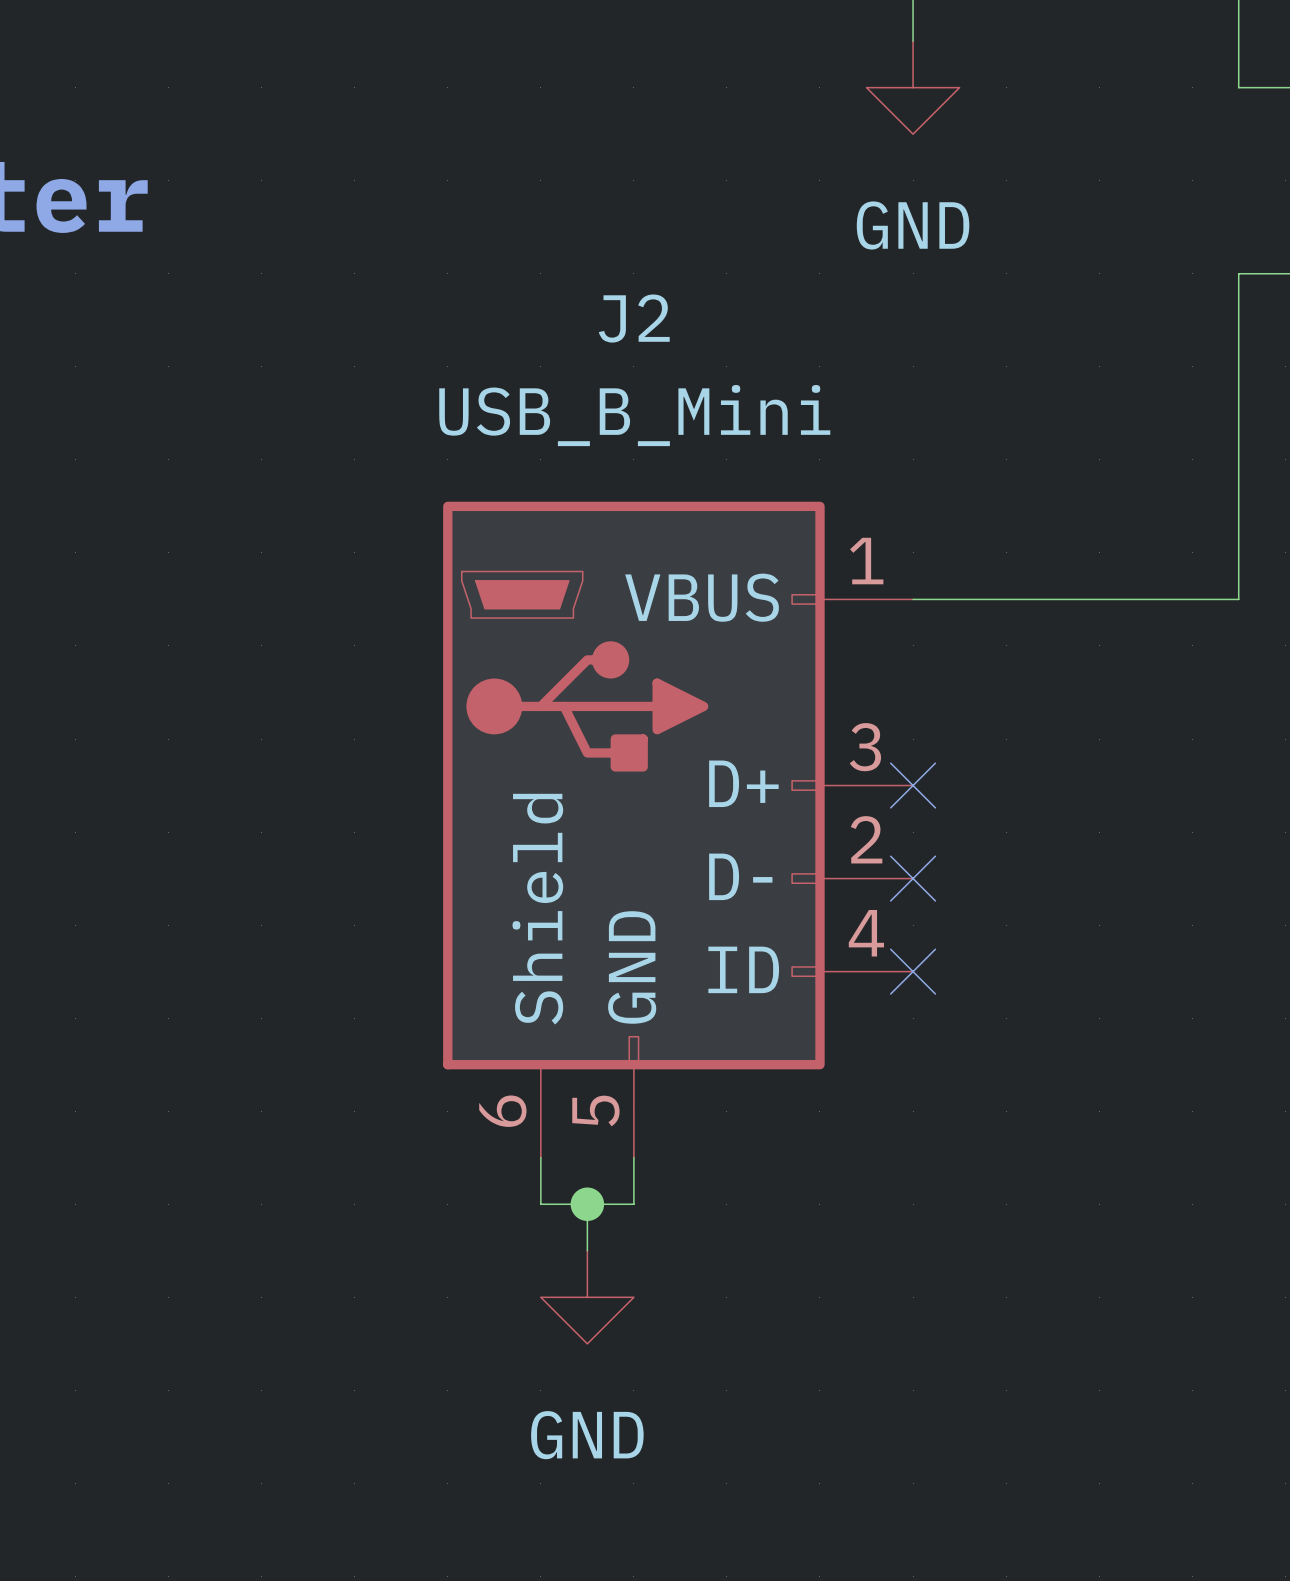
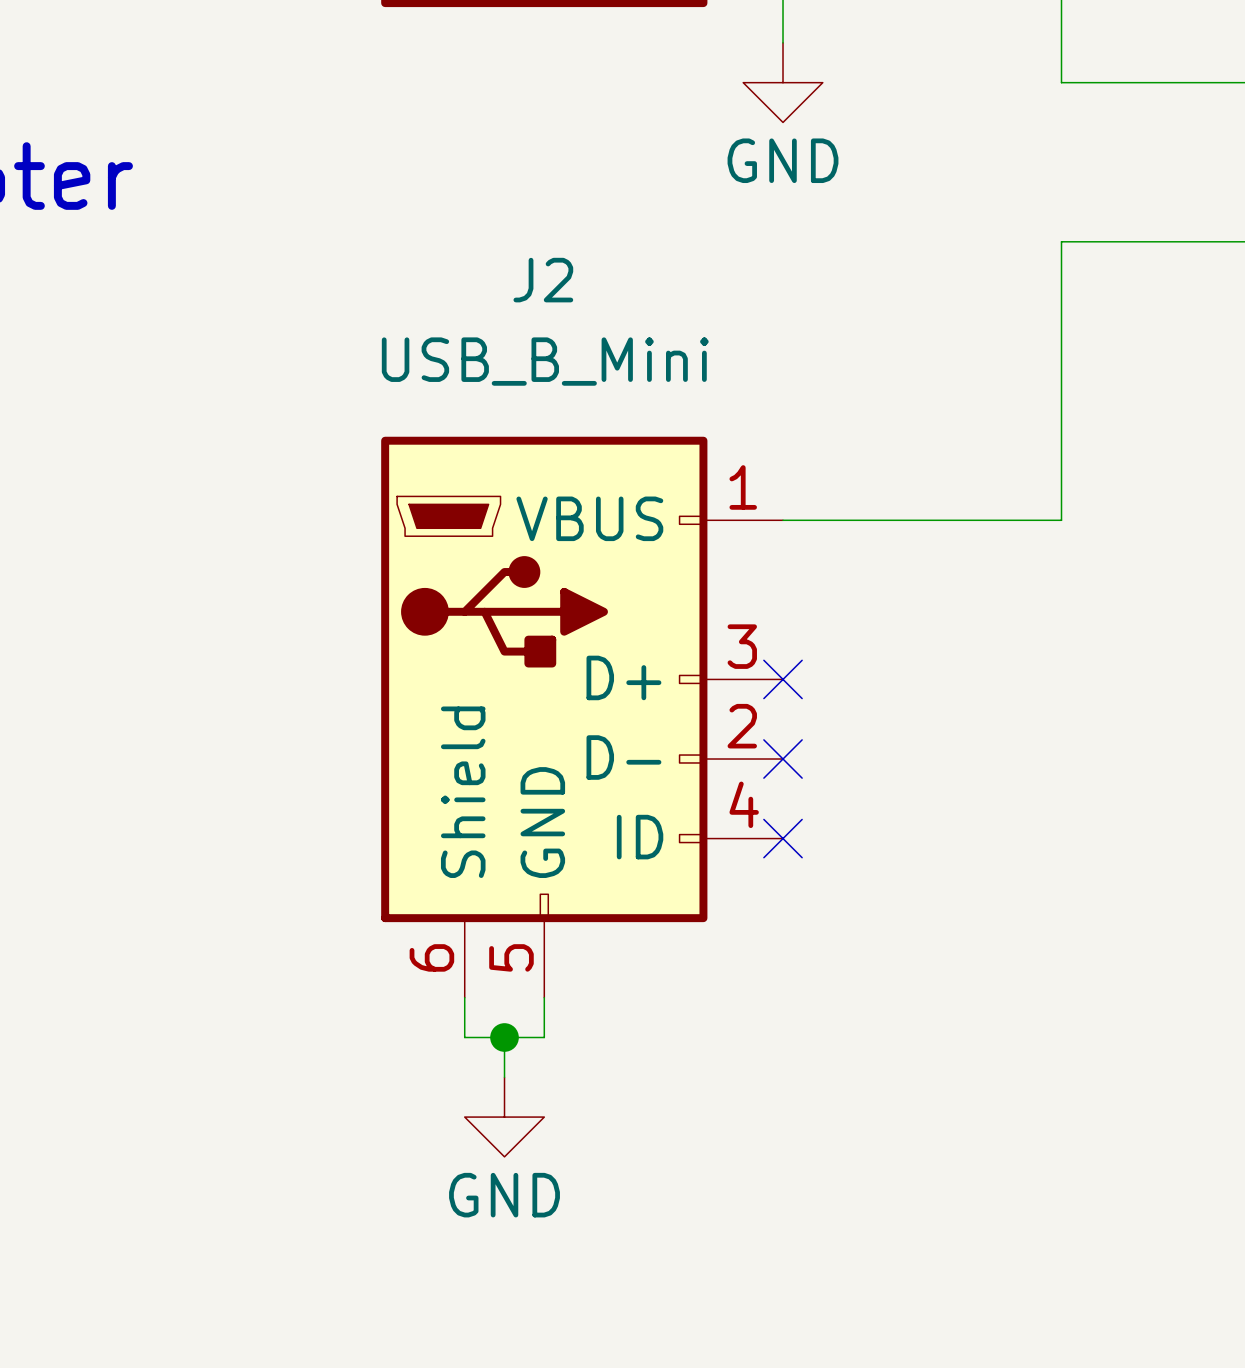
power symbol text position: GND (913, 225) -> GND (783, 160)
power symbol text position: GND (587, 1435) -> GND (504, 1195)

